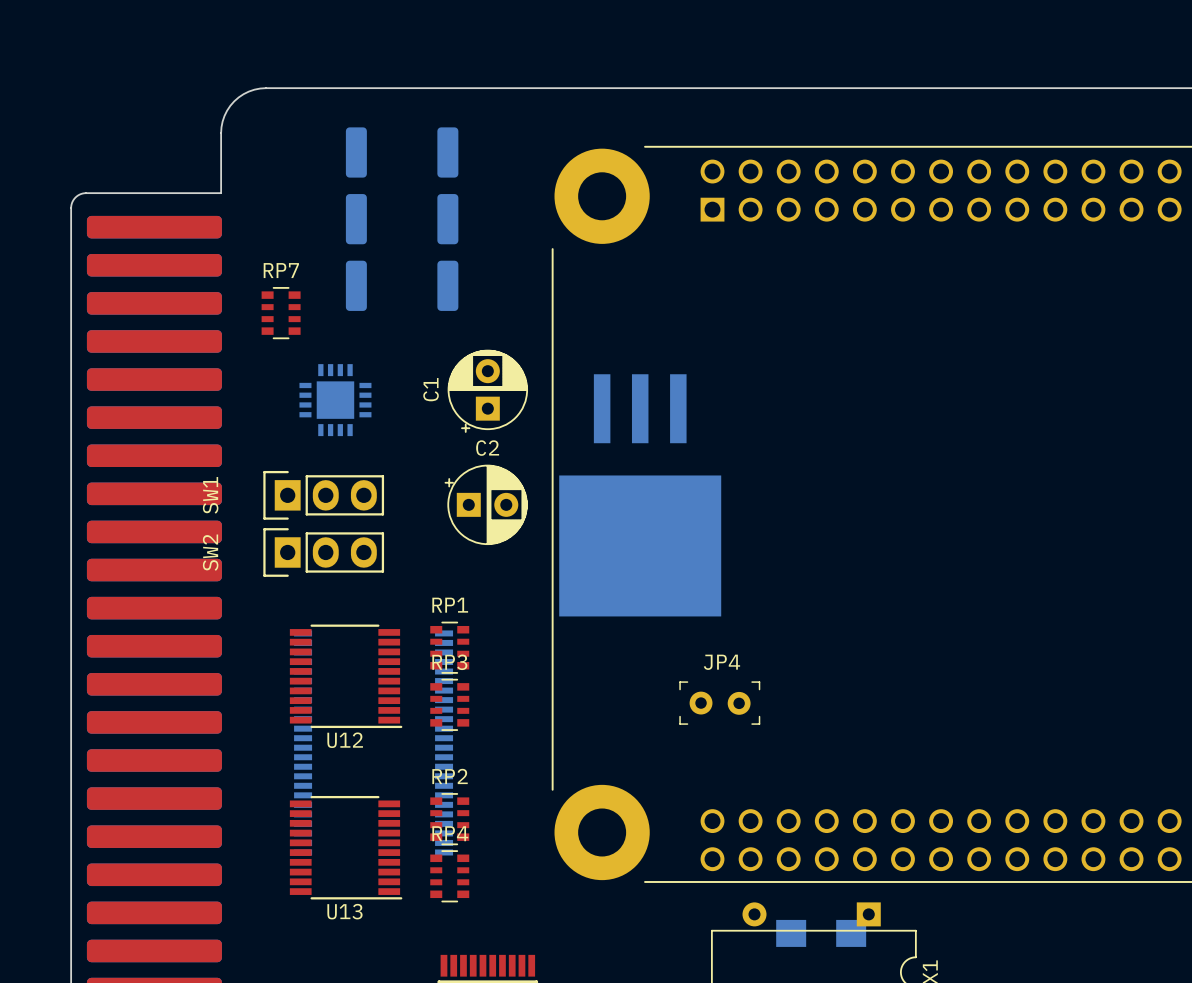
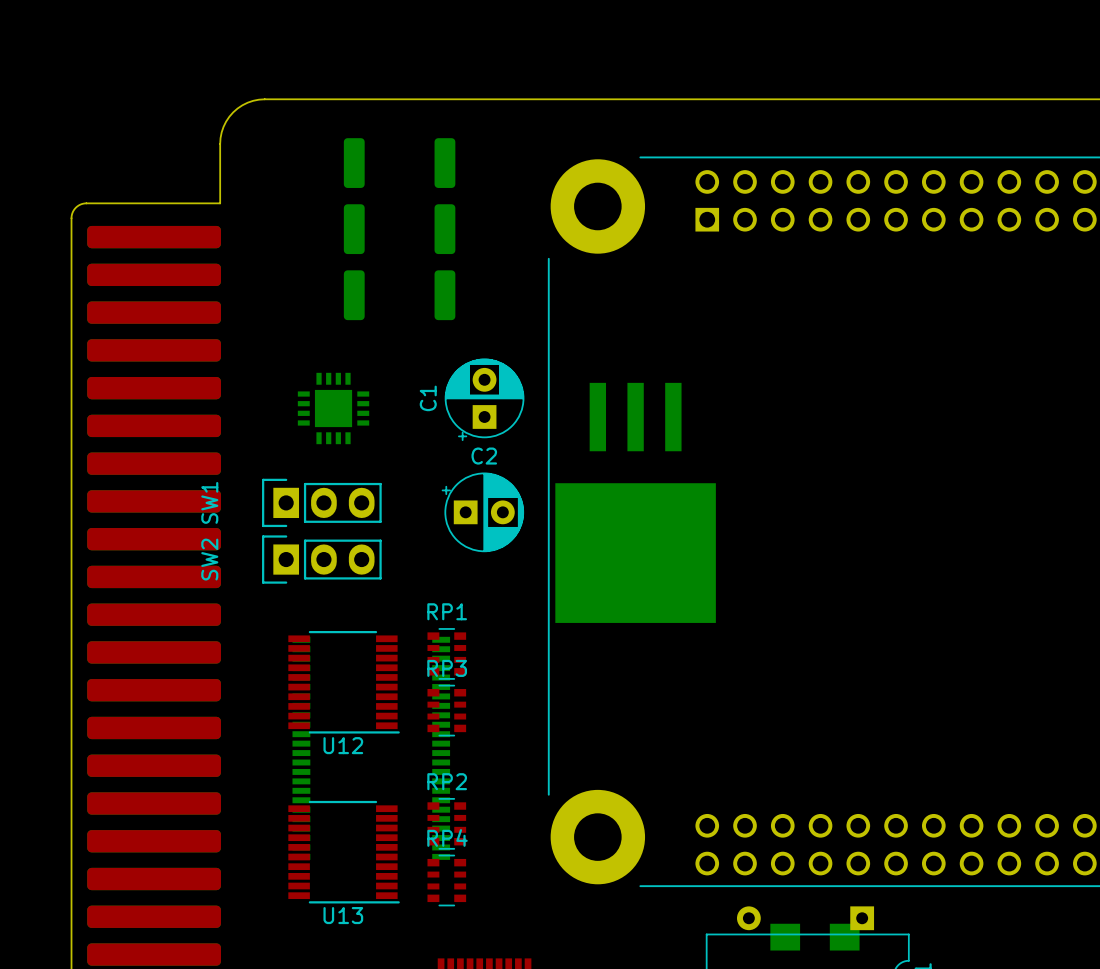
RP7: (281, 313) -> none
JP4: (719, 703) -> none

